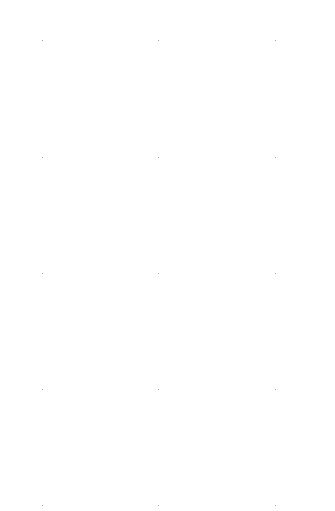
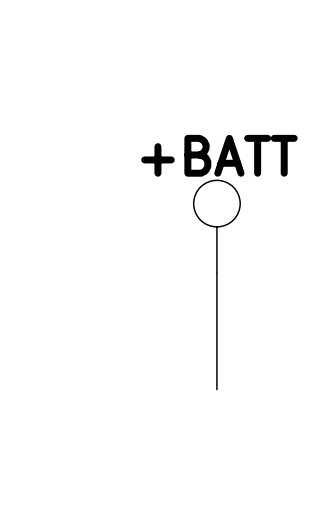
power symbol: none -> +BATT (216, 226)
wire: none -> (216, 273) (216, 389)

